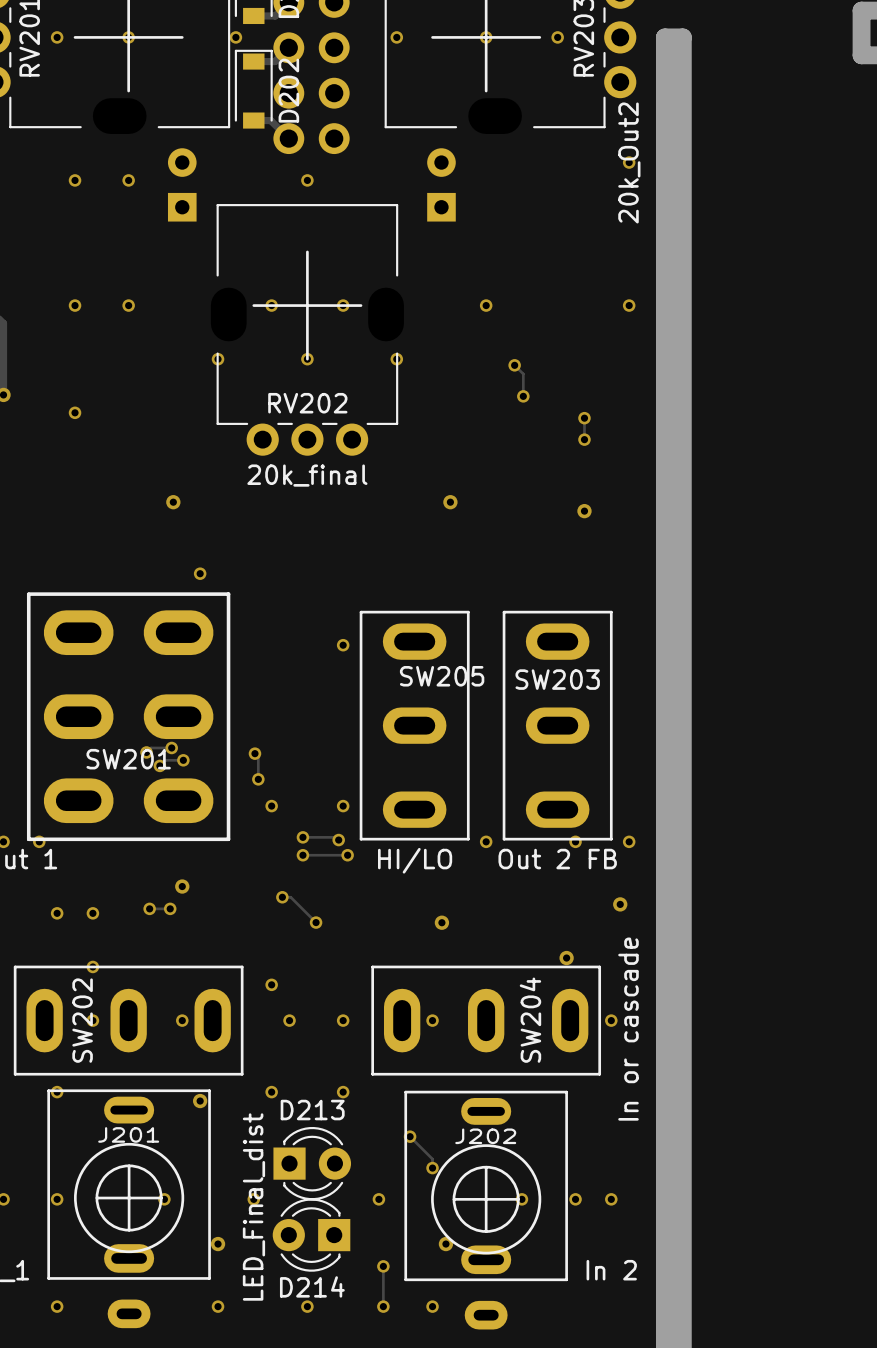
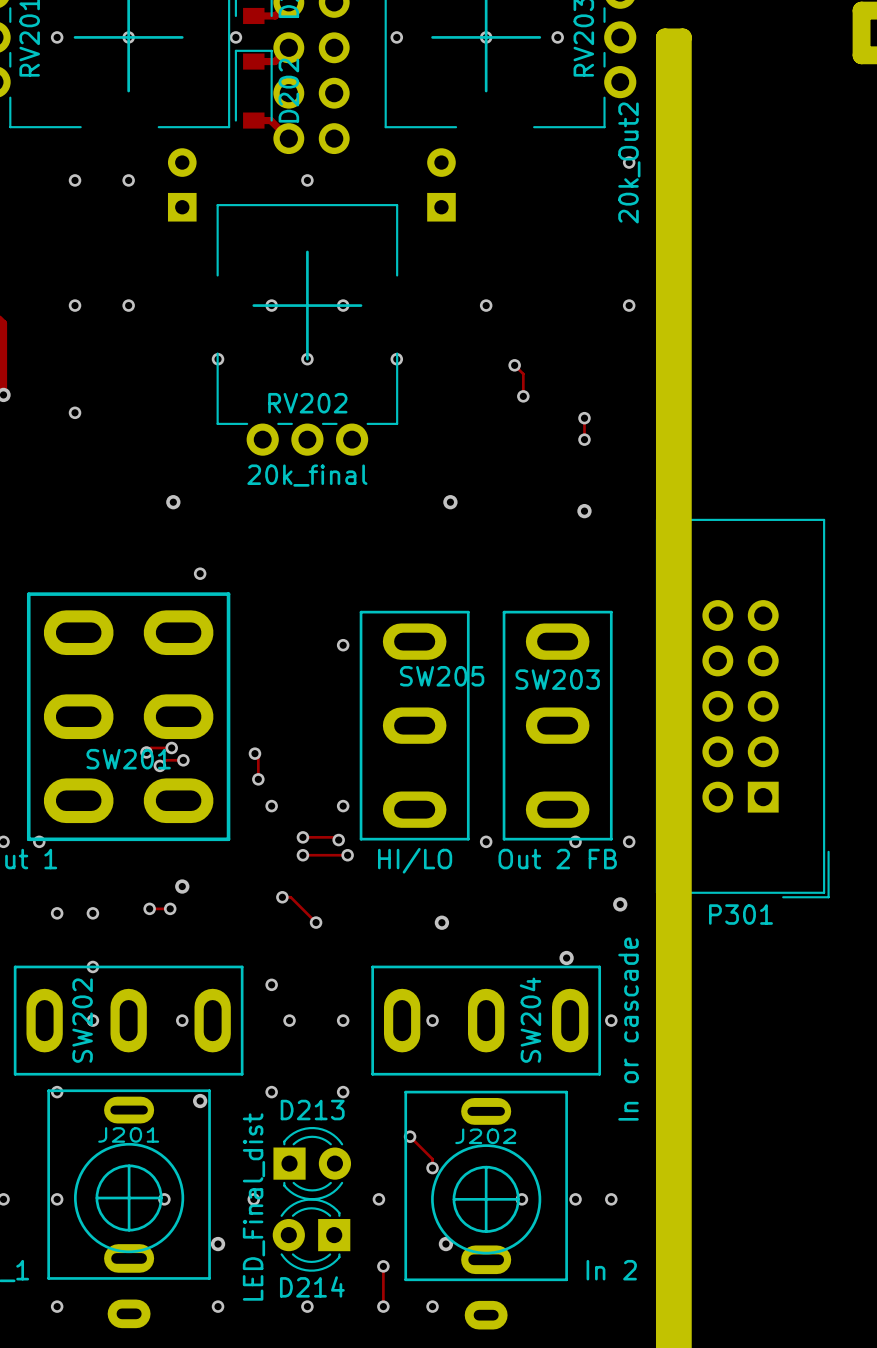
P301: none -> (742, 708)

